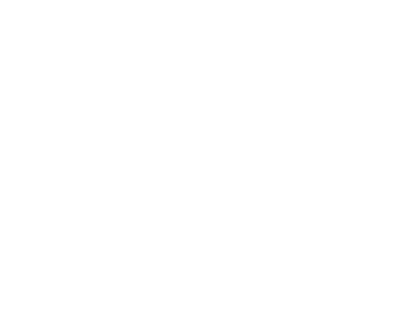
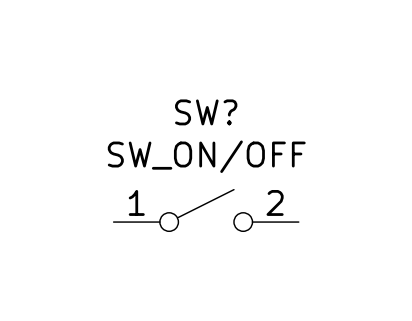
SW?: none -> SW_ON/OFF (206, 210)

